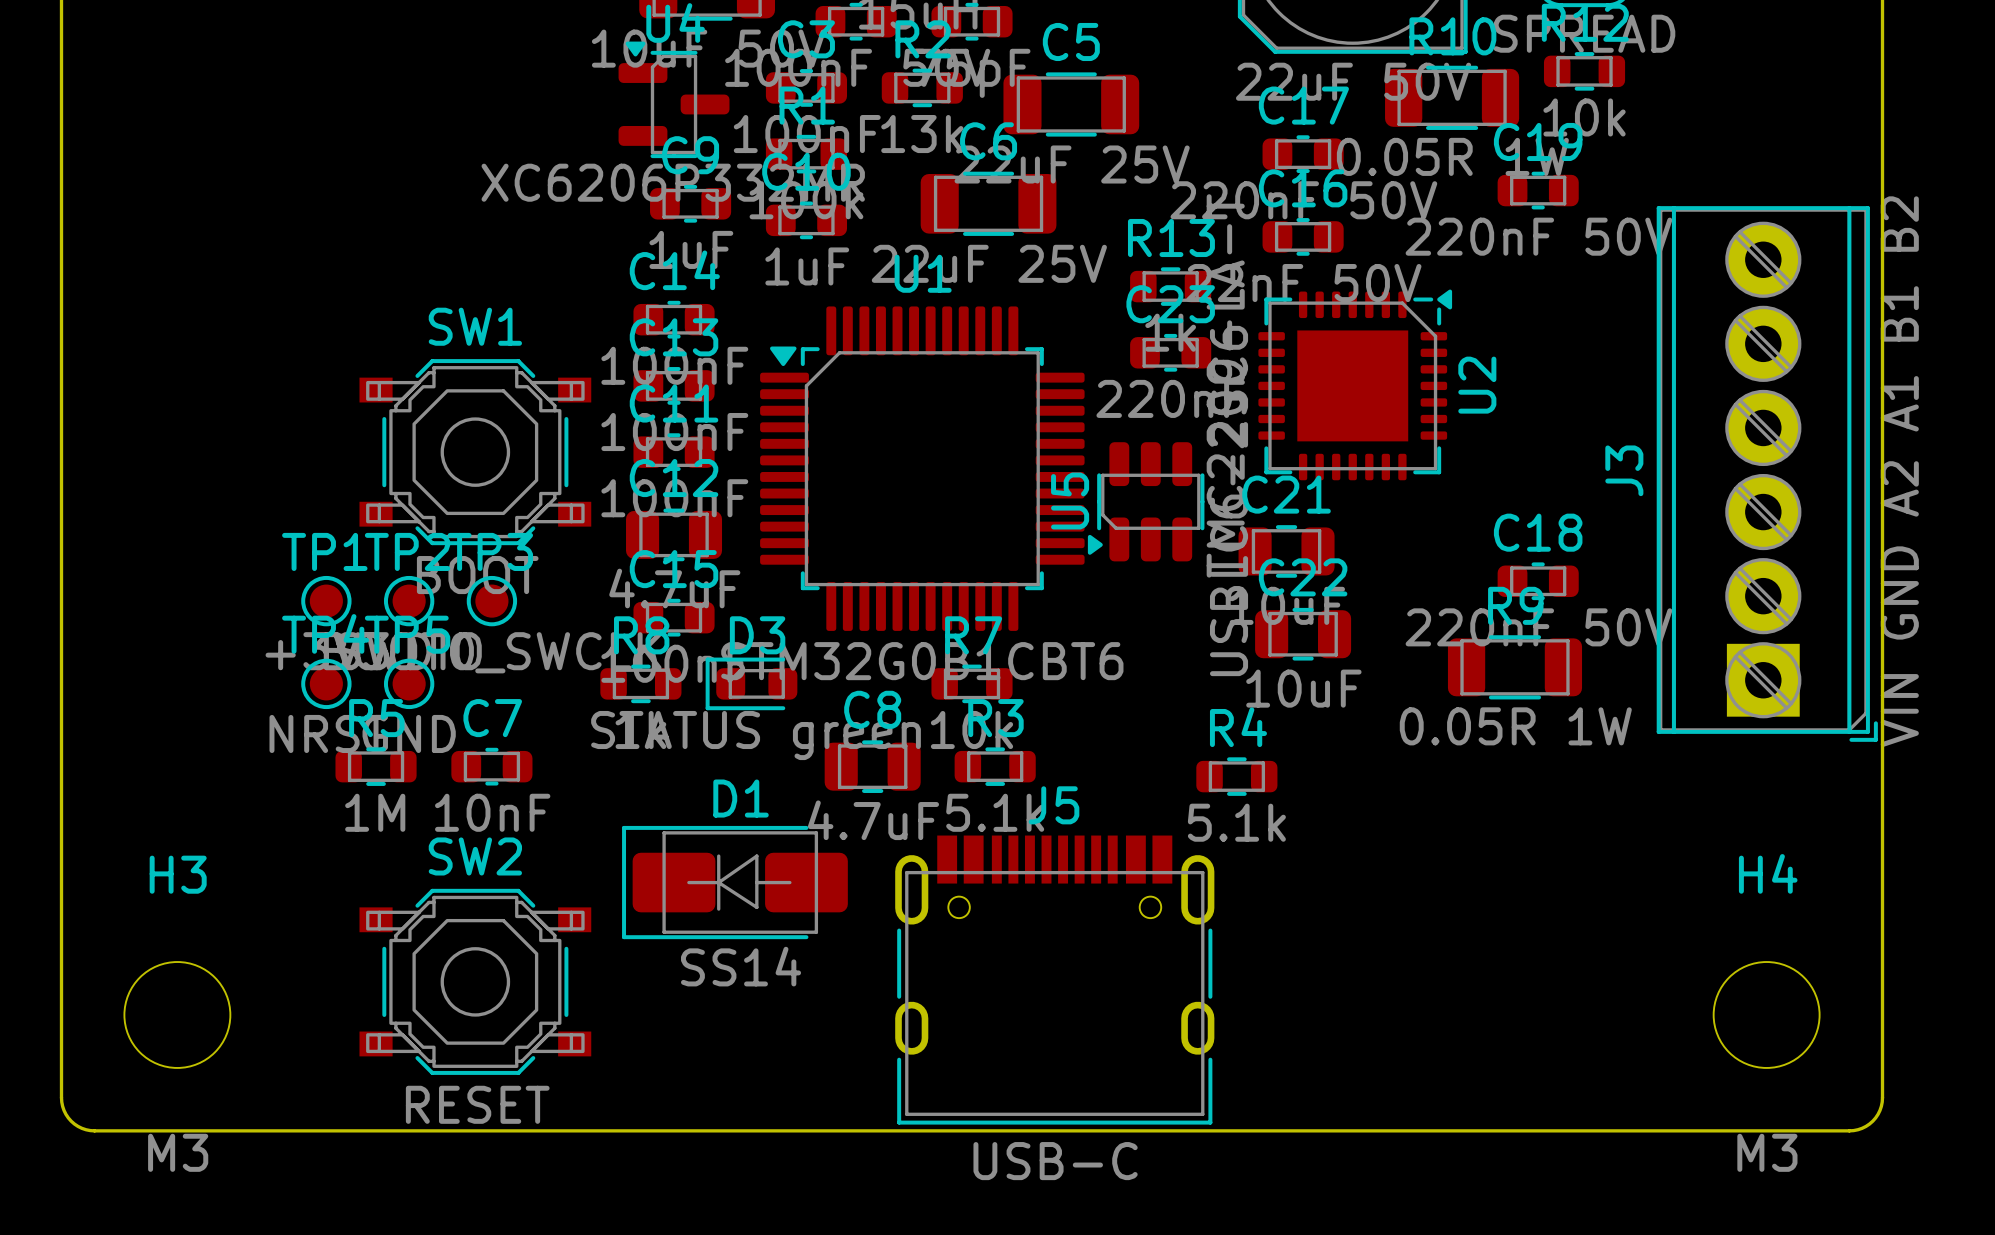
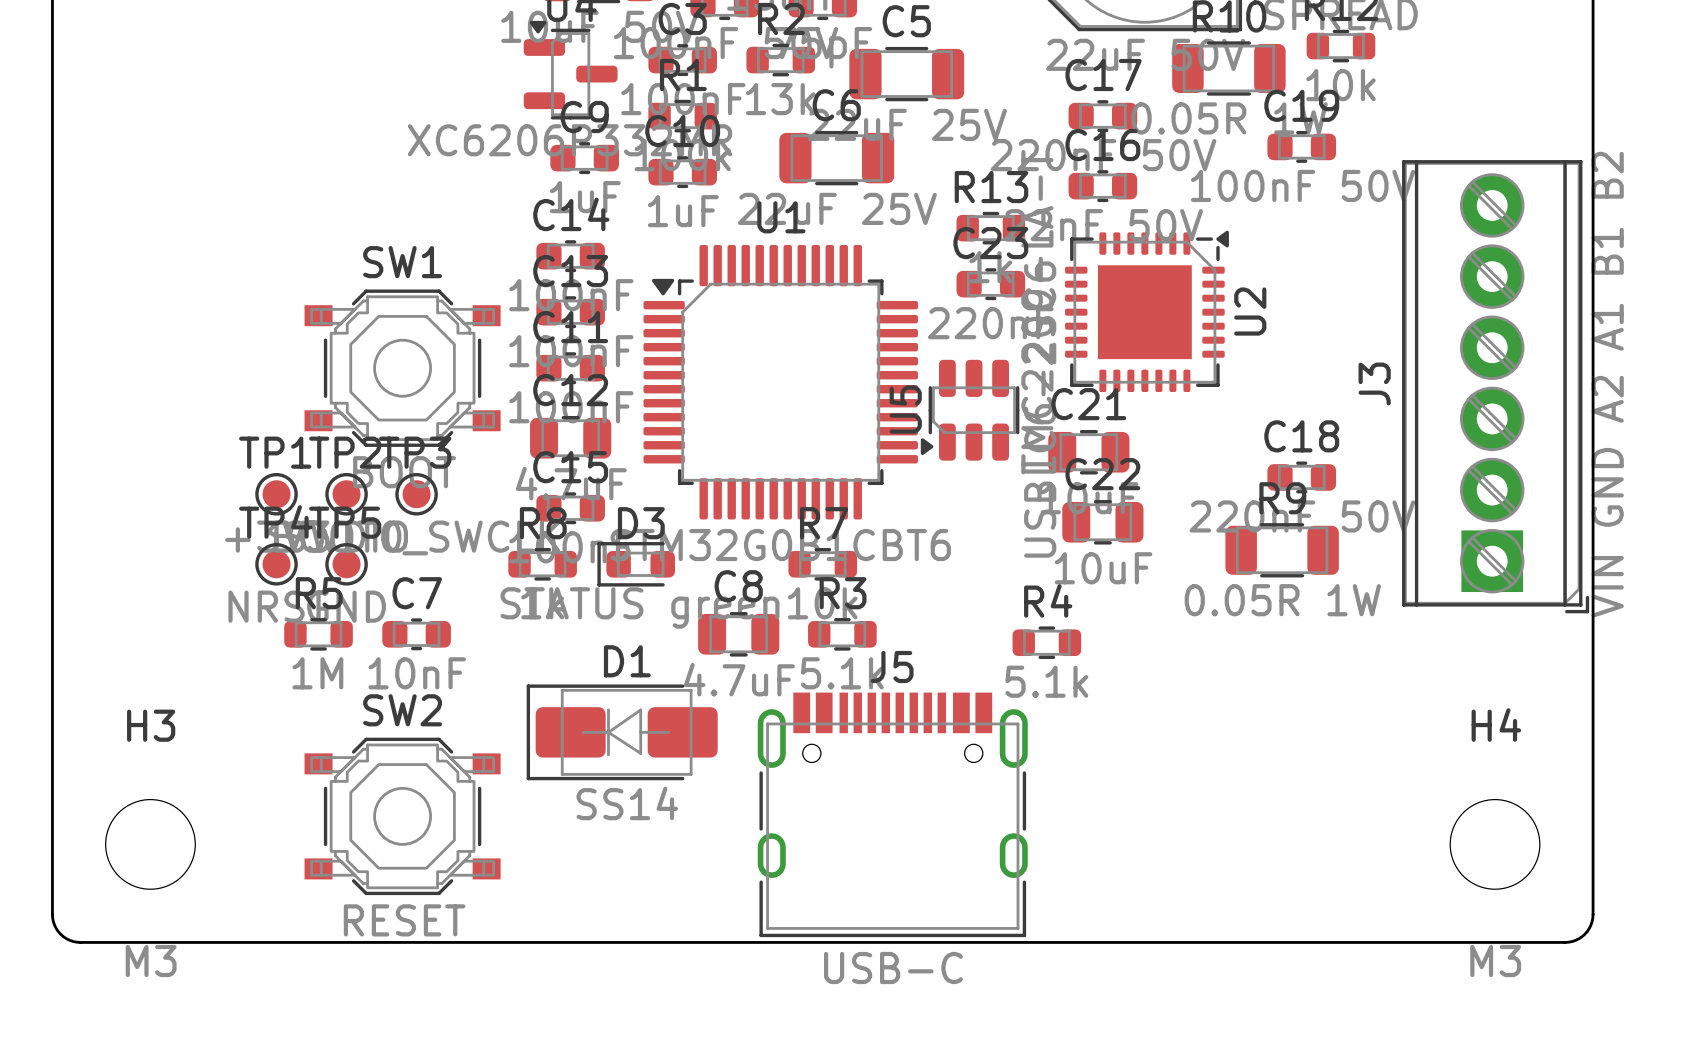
C19 value: 220nF 50V (1538, 236) -> 100nF 50V (1303, 185)

